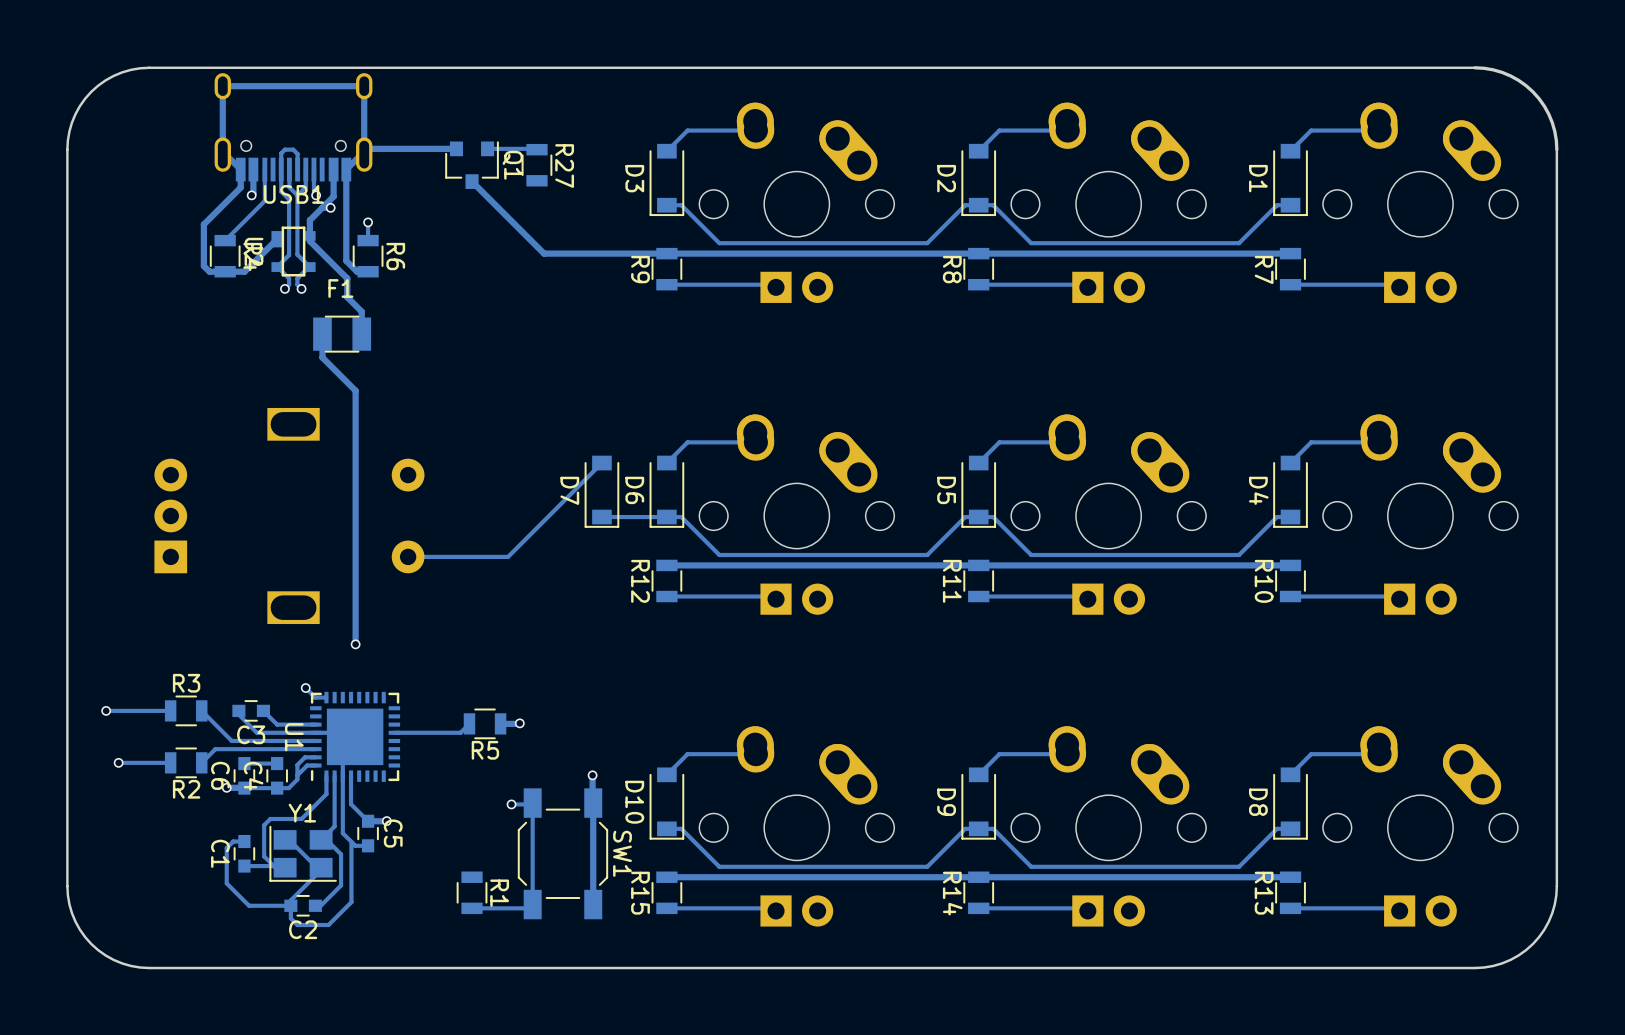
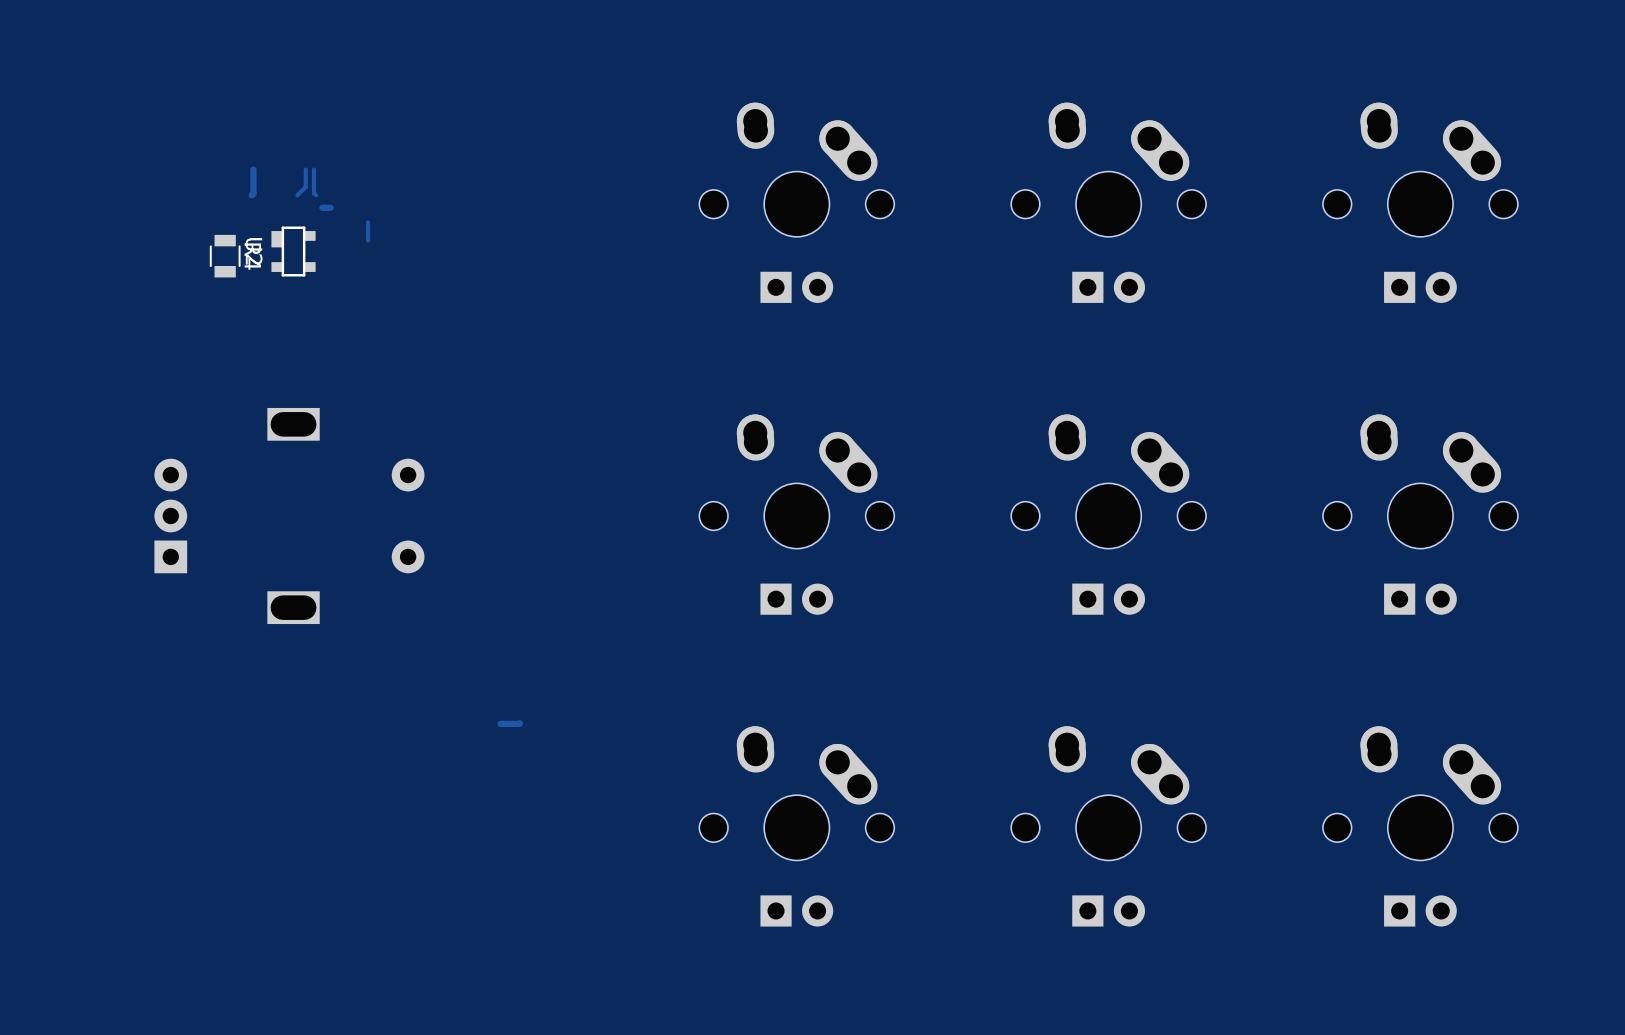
board edge: (1475, 67) (149, 67) (122, 72) (105, 80) (91, 91) (75, 114) (69, 131) (67, 149) (67, 886) (71, 913) (79, 929) (91, 944) (105, 955) (131, 965) (149, 968) (1475, 968) (1493, 965) (1518, 955) (1532, 944) (1548, 921) (1554, 904) (1556, 886) (1556, 149) (1554, 131) (1548, 114) (1532, 91) (1510, 75) (1493, 69) (1475, 67) -> none
USB1: (293, 127) -> none
track: (755, 130) (687, 130) (666, 151) -> none
track: (1067, 130) (999, 130) (978, 151) -> none
track: (1379, 130) (1311, 130) (1290, 151) -> none
track: (456, 148) (369, 148) (364, 154) -> none
track: (487, 148) (536, 149) -> none
track: (364, 154) (364, 86) (222, 86) (222, 154) (225, 154) (240, 169) (240, 187) (203, 224) (203, 266) (209, 271) (244, 271) (277, 239) -> none
track: (364, 154) (361, 154) (346, 169) (346, 260) (357, 271) (368, 271) -> none
Q1: (472, 165) -> none
R27: (536, 165) -> none
track: (264, 169) (264, 200) (225, 240) -> none
track: (289, 169) (289, 187) (297, 195) (297, 254) (309, 267) (297, 278) (297, 284) (301, 288) -> none
track: (297, 169) (297, 153) (293, 149) (284, 149) (281, 153) (281, 191) (289, 199) (289, 255) (277, 267) (289, 278) (289, 284) (284, 288) -> none
track: (333, 169) (333, 196) (309, 220) (309, 241) (347, 278) (347, 297) (361, 311) (361, 334) -> none
D3: (666, 179) -> none
D2: (978, 179) -> none
D1: (1290, 179) -> none
track: (472, 181) (544, 253) (1290, 253) -> none
via: (251, 195) -> none
via: (316, 195) -> none
track: (1290, 205) (1277, 205) (1239, 243) (1031, 243) (993, 205) (965, 205) (927, 243) (719, 243) (681, 205) (666, 205) -> none
via: (330, 207) -> none
via: (368, 222) -> none
R6: (368, 256) -> none
R9: (666, 269) -> none
R8: (978, 269) -> none
R7: (1290, 269) -> none
track: (666, 284) (773, 284) (776, 287) -> none
track: (978, 284) (1085, 284) (1087, 287) -> none
track: (1290, 284) (1397, 284) (1399, 287) -> none
via: (284, 288) -> none
via: (301, 288) -> none
track: (322, 334) (322, 357) (355, 390) (355, 644) -> none
F1: (342, 334) -> none
track: (755, 442) (687, 442) (666, 463) -> none
track: (1067, 442) (999, 442) (978, 463) -> none
track: (1379, 442) (1311, 442) (1290, 463) -> none
track: (601, 463) (508, 556) (408, 556) -> none
D7: (601, 491) -> none
D6: (666, 491) -> none
D5: (978, 491) -> none
D4: (1290, 491) -> none
track: (1290, 517) (1277, 517) (1239, 554) (1031, 554) (993, 517) (965, 517) (927, 554) (719, 554) (681, 517) (601, 517) -> none
track: (1290, 565) (666, 565) -> none
R12: (666, 580) -> none
R11: (978, 580) -> none
R10: (1290, 580) -> none
track: (666, 596) (773, 596) (776, 599) -> none
track: (978, 596) (1085, 596) (1087, 599) -> none
track: (1290, 596) (1397, 596) (1399, 599) -> none
via: (355, 644) -> none
track: (305, 688) (315, 697) (326, 697) -> none
via: (305, 688) -> none
via: (106, 710) -> none
track: (170, 710) (106, 710) -> none
R3: (186, 710) -> none
track: (201, 710) (231, 740) (315, 740) -> none
track: (238, 710) (238, 714) (256, 732) (333, 732) (342, 741) (342, 833) (355, 845) (368, 845) -> none
C3: (251, 710) -> none
track: (263, 710) (277, 724) (315, 724) -> none
track: (469, 723) (460, 732) (394, 732) -> none
R5: (485, 723) -> none
via: (519, 723) -> none
U1: (355, 736) -> none
track: (315, 749) (215, 749) (201, 762) -> none
track: (755, 754) (687, 754) (666, 774) -> none
track: (1067, 754) (999, 754) (978, 774) -> none
track: (1379, 754) (1311, 754) (1290, 774) -> none
track: (315, 757) (305, 757) (297, 764) (297, 779) (288, 788) (226, 787) -> none
via: (118, 762) -> none
track: (170, 762) (118, 762) -> none
R2: (186, 762) -> none
track: (277, 763) (244, 763) -> none
track: (315, 765) (307, 765) (297, 775) -> none
C6: (244, 775) -> none
C4: (277, 775) -> none
track: (592, 775) (593, 904) -> none
via: (592, 775) -> none
track: (326, 776) (326, 794) (301, 818) (270, 818) (264, 825) (264, 856) (275, 867) (285, 867) (283, 866) (244, 866) -> none
track: (334, 776) (334, 826) (321, 839) (326, 839) (341, 854) (341, 885) (320, 905) (315, 905) -> none
track: (351, 776) (351, 804) (368, 821) (386, 821) -> none
via: (226, 787) -> none
D10: (666, 803) -> none
D9: (978, 803) -> none
D8: (1290, 803) -> none
track: (511, 804) (532, 803) (532, 904) (528, 908) (472, 908) -> none
via: (511, 804) -> none
via: (386, 821) -> none
track: (1290, 828) (1277, 828) (1239, 866) (1031, 866) (993, 828) (965, 828) (927, 866) (719, 866) (681, 828) (666, 828) -> none
C5: (368, 833) -> none
track: (285, 839) (289, 839) (317, 867) (321, 867) (321, 870) (290, 900) (290, 918) (297, 925) (328, 925) (351, 902) (351, 841) -> none
track: (244, 841) (233, 841) (226, 848) (226, 883) (249, 905) (290, 905) -> none
C1: (244, 853) -> none
Y1: (303, 853) -> none
SW1: (562, 853) -> none
track: (1290, 877) (666, 877) -> none
R1: (472, 892) -> none
R15: (666, 892) -> none
R14: (978, 892) -> none
R13: (1290, 892) -> none
C2: (303, 905) -> none
track: (666, 908) (773, 908) (776, 910) -> none
track: (978, 908) (1085, 908) (1087, 910) -> none
track: (1290, 908) (1397, 908) (1399, 910) -> none

